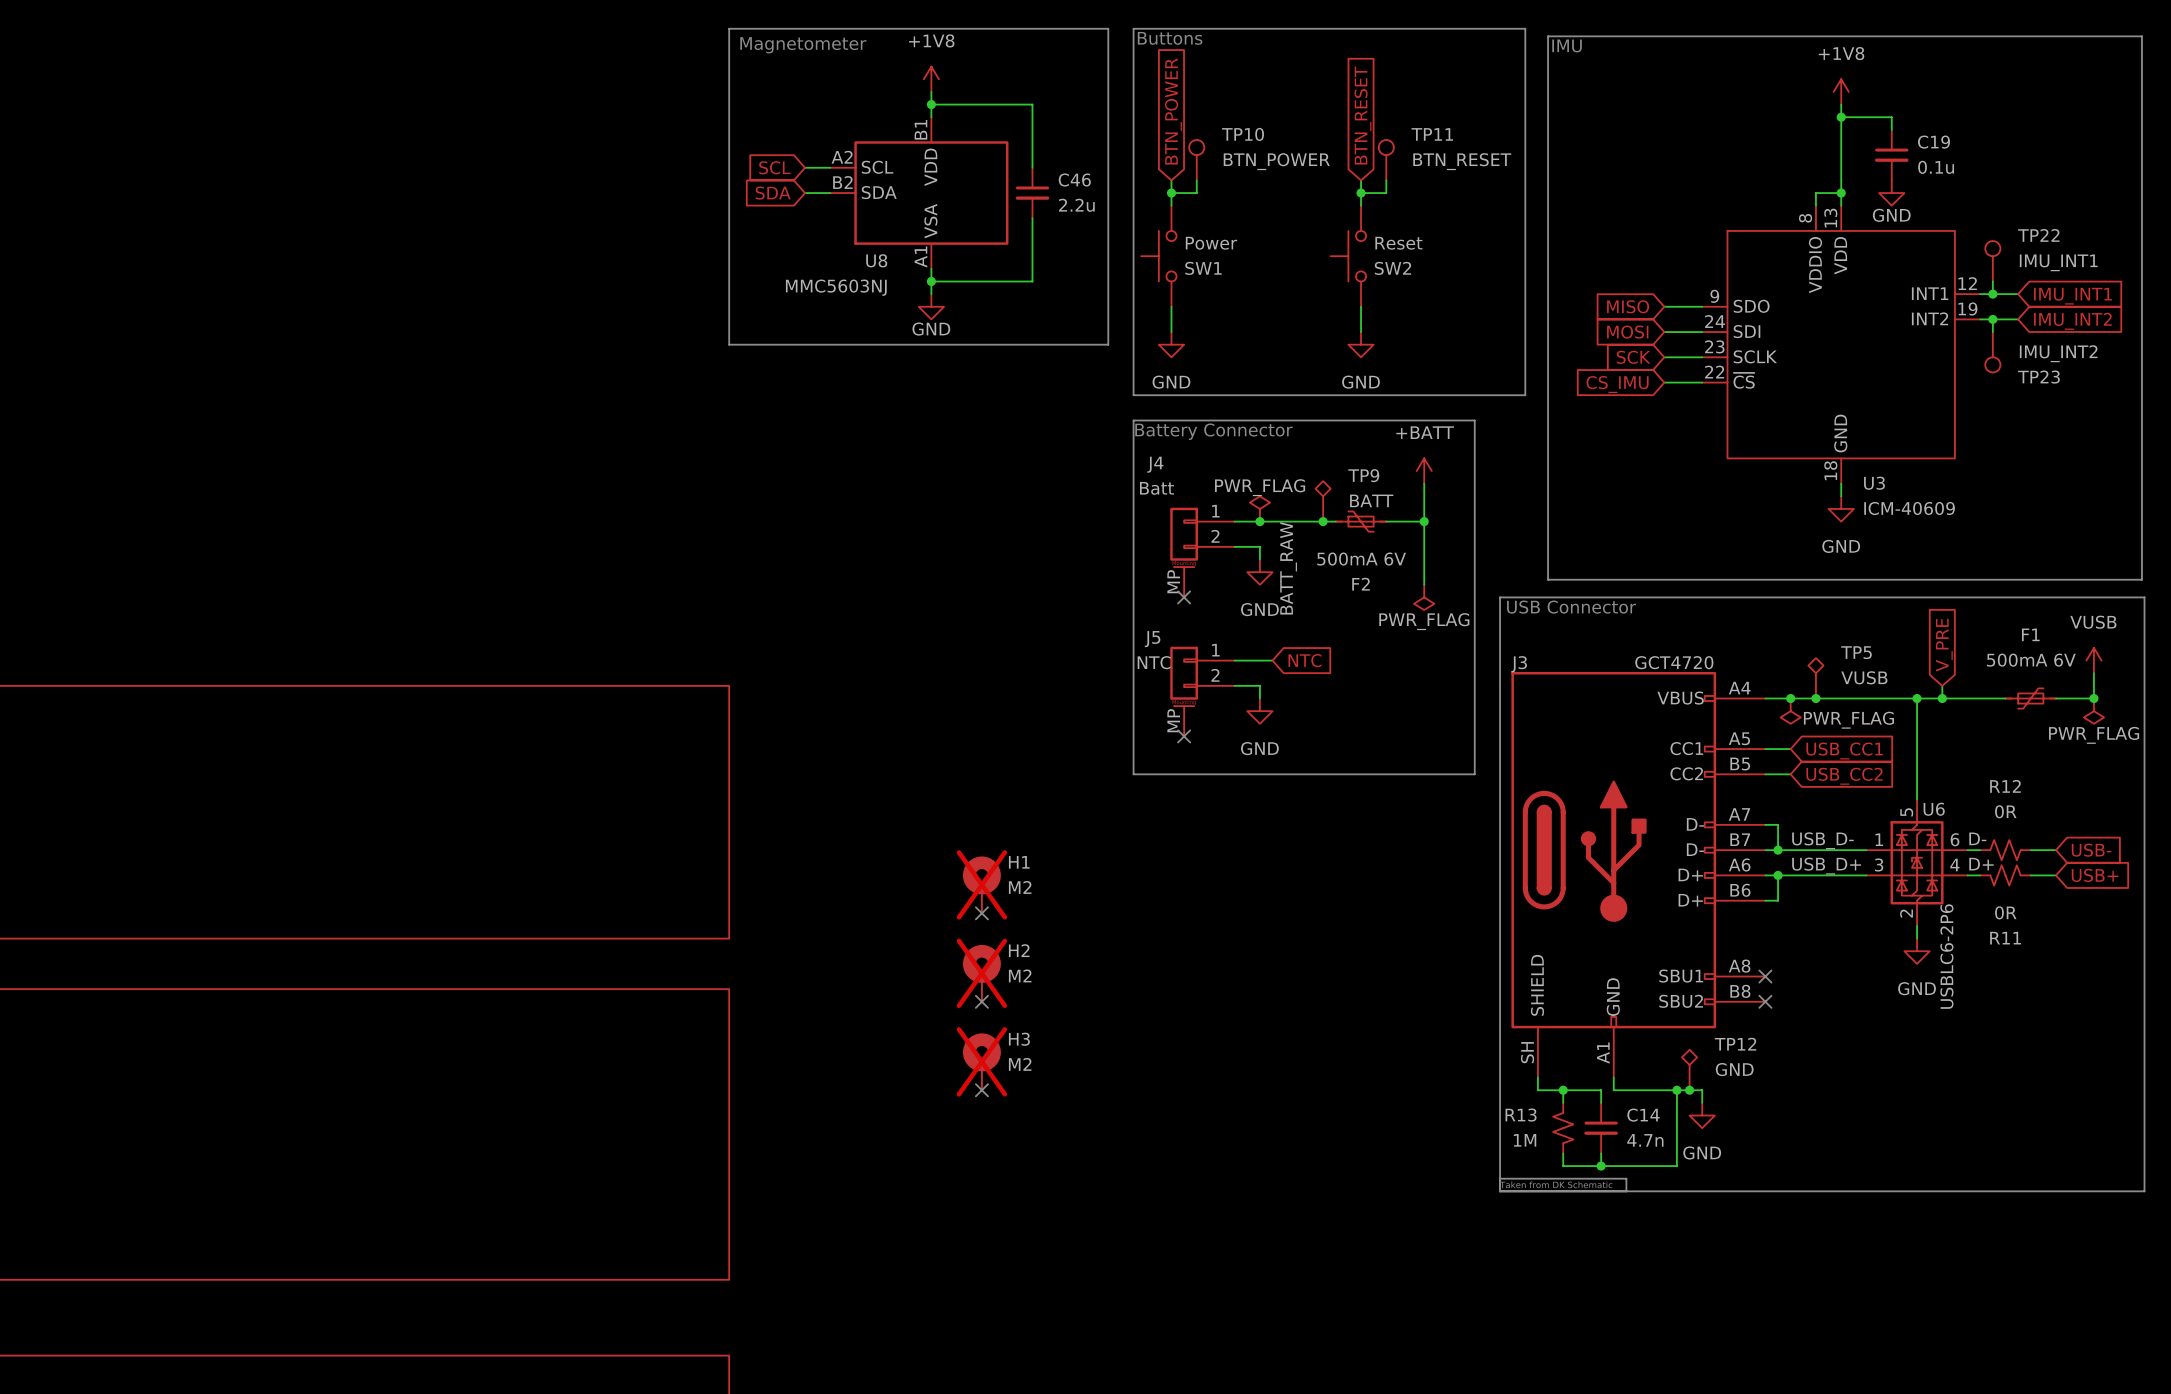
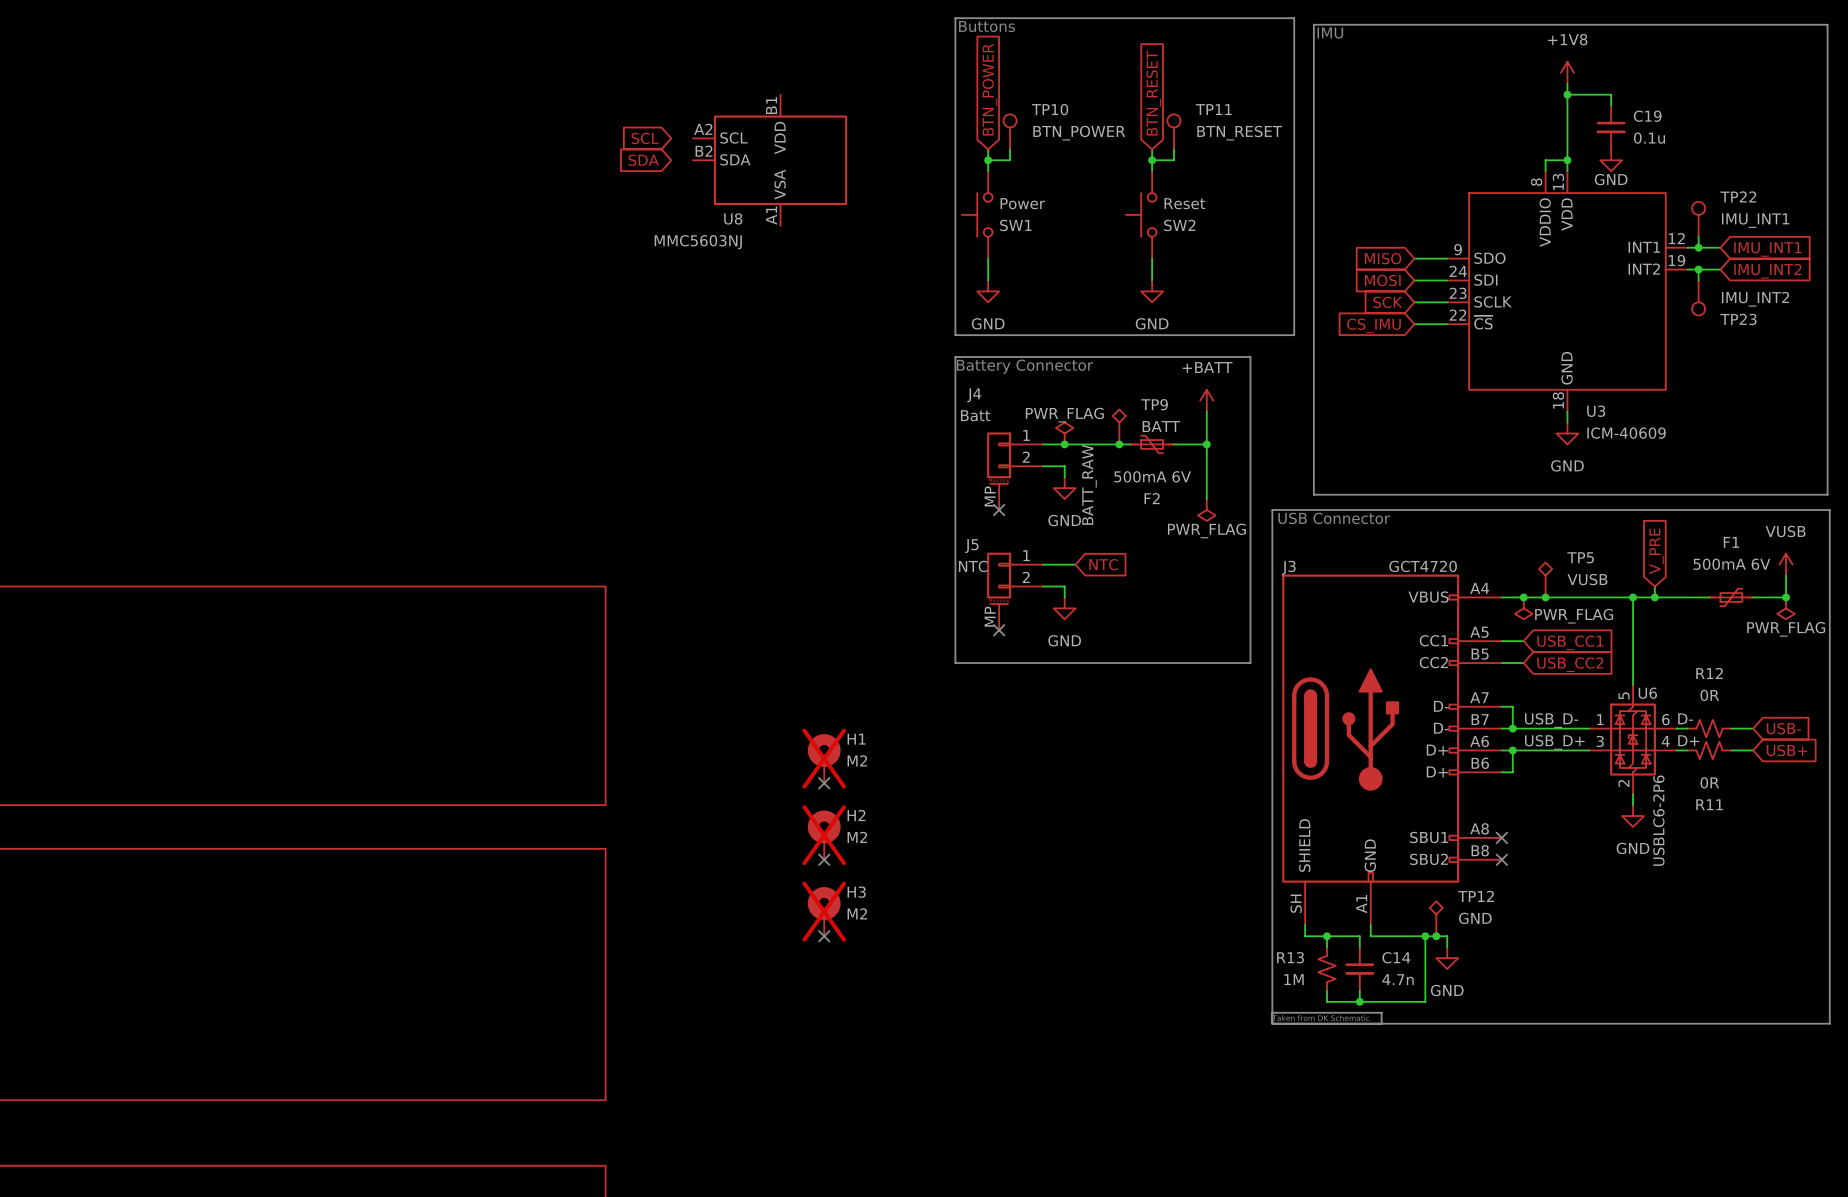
line: (729, 28) (1108, 28) (1108, 344) (729, 344) (729, 28) -> none
text: Magnetometer (803, 45) -> none
power symbol: +1V8 (931, 79) -> none
wire: (931, 91) (931, 117) -> none
wire: (931, 104) (1032, 104) (1032, 167) -> none
junction: (931, 104) -> none
wire: (805, 167) (830, 167) -> none
wire: (805, 193) (830, 193) -> none
C46: 2.2u (1032, 193) -> none
wire: (1032, 218) (1032, 281) (931, 281) -> none
wire: (931, 268) (931, 294) -> none
junction: (931, 281) -> none
power symbol: GND (931, 306) -> none

